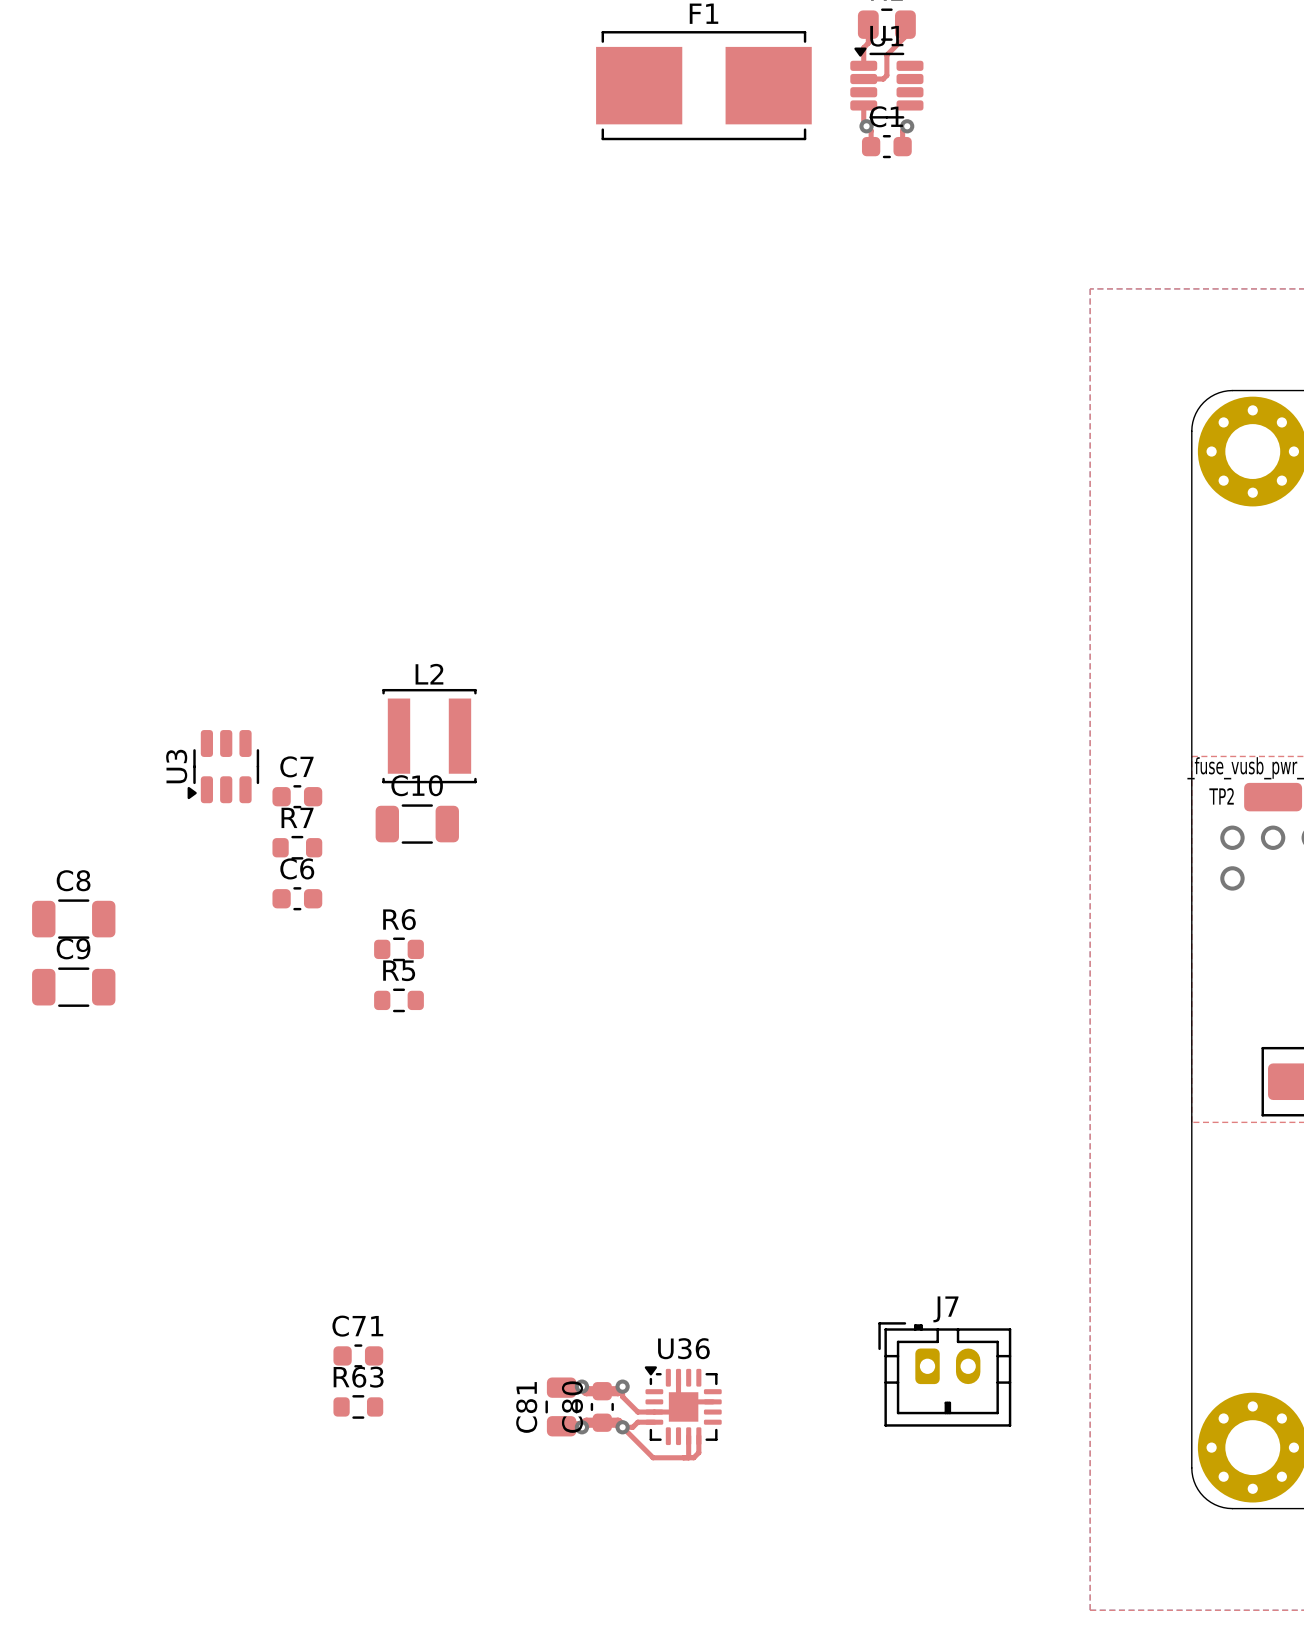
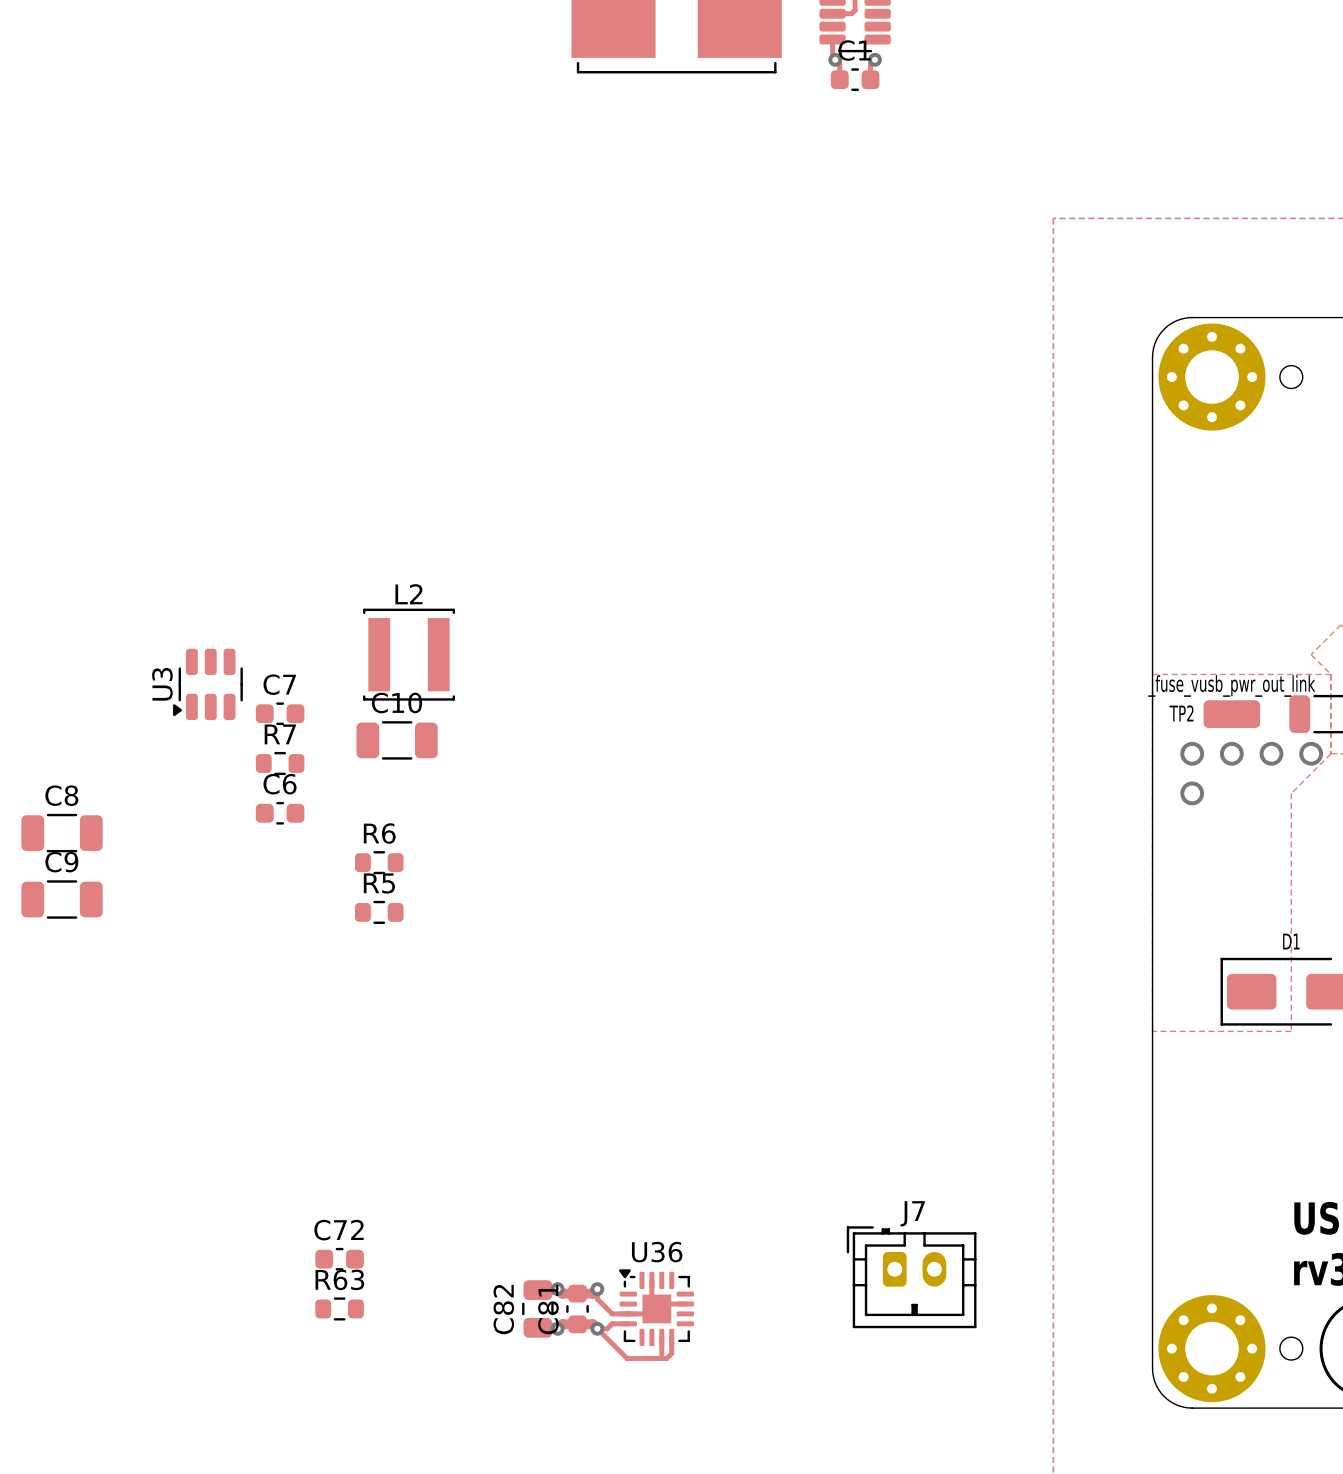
C71 name: C71 (357, 1326) -> C72 (339, 1230)
C81 name: C81 (526, 1407) -> C82 (503, 1309)
C80 name: C80 (572, 1407) -> C81 (548, 1309)

